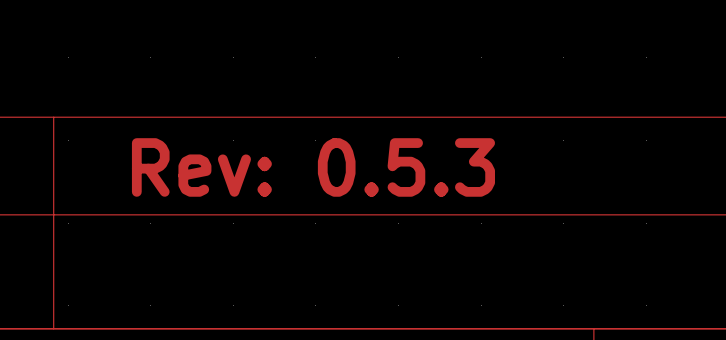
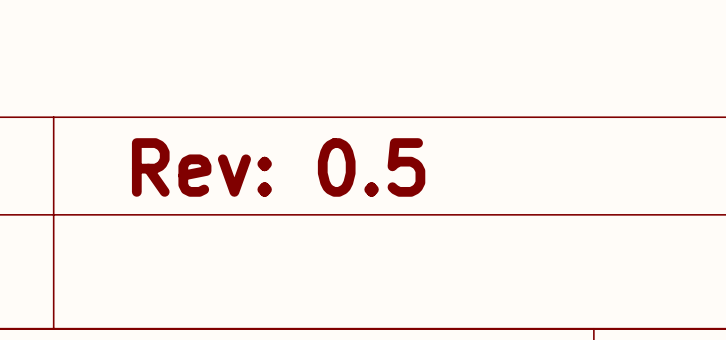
title block: Rev: 0.5.3 (313, 167) -> Rev: 0.5 (278, 167)

